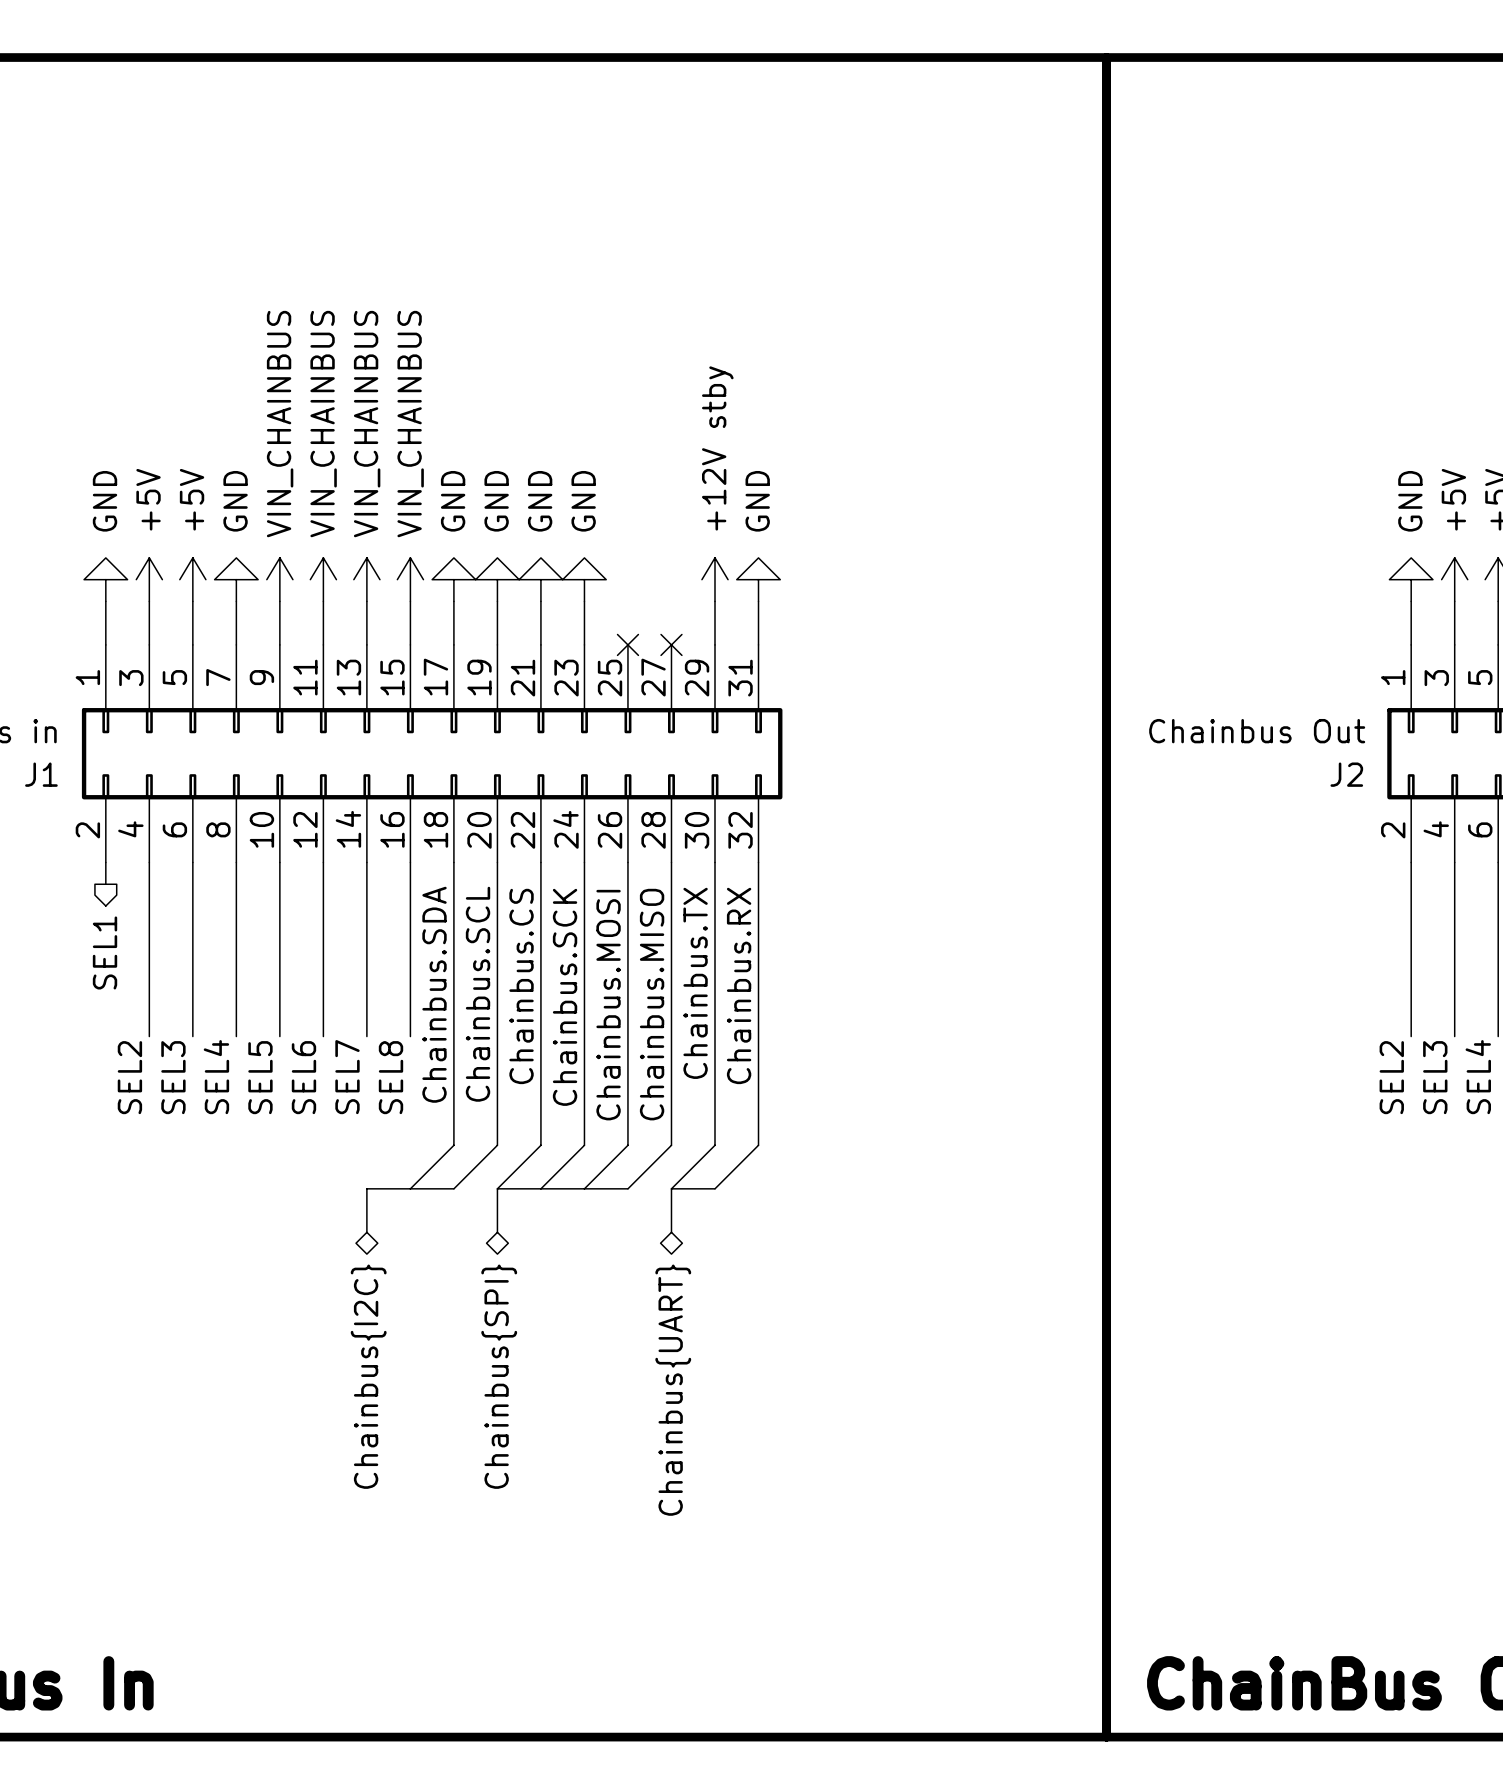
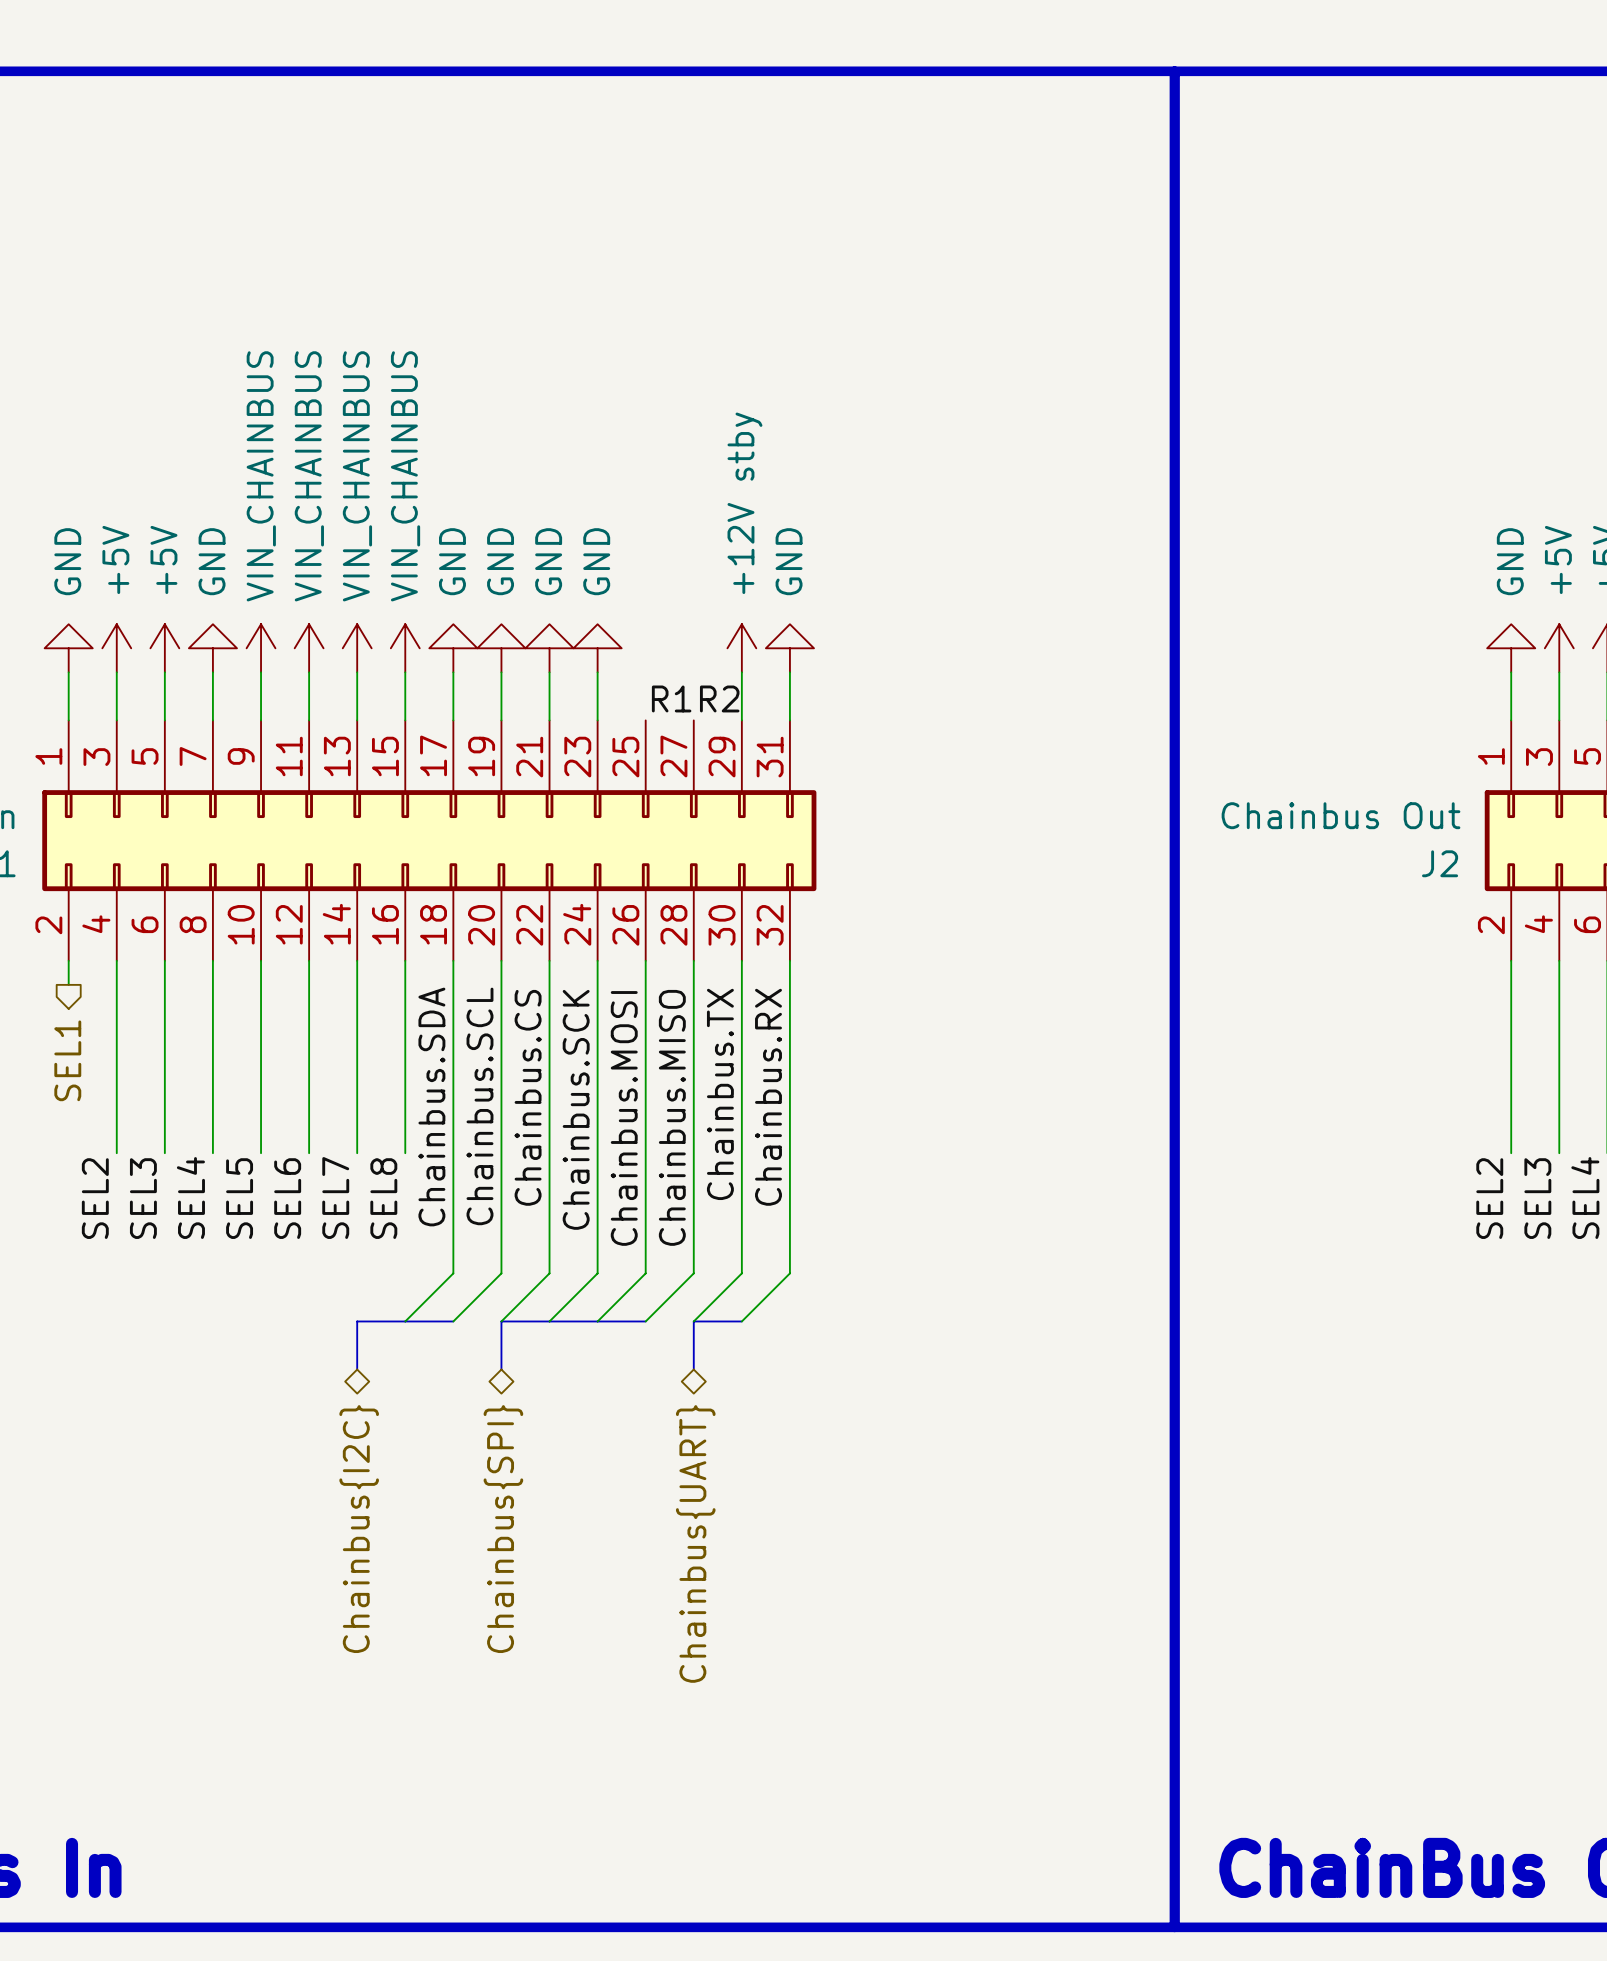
label: none -> R1 (671, 698)
label: none -> R2 (719, 698)
no-connect mark: (627, 644) -> none
no-connect mark: (671, 644) -> none

